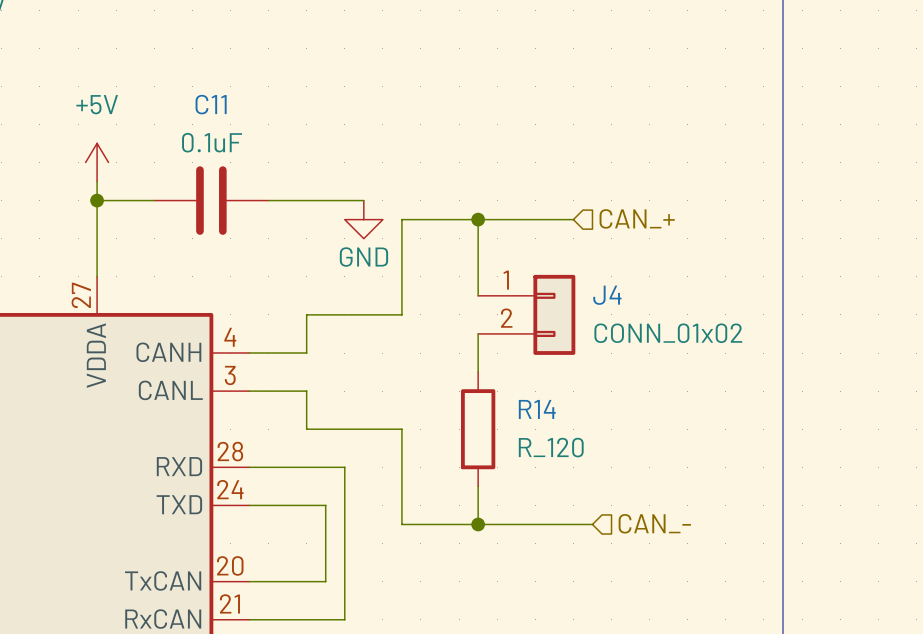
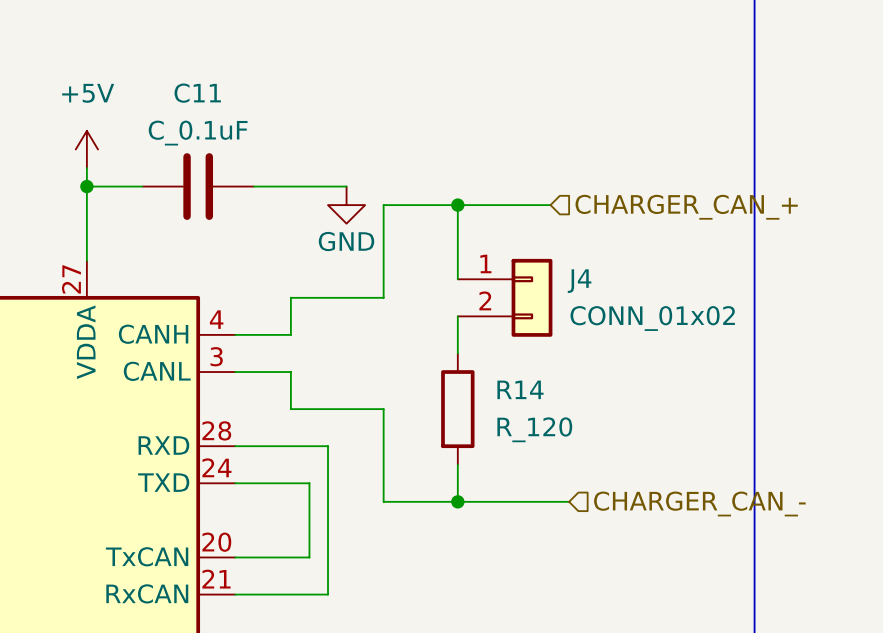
C11 value: 0.1uF (212, 142) -> C_0.1uF (198, 133)
hierarchical label: CAN_+ (637, 218) -> CHARGER_CAN_+ (686, 207)
hierarchical label: CAN_- (654, 523) -> CHARGER_CAN_- (699, 503)

